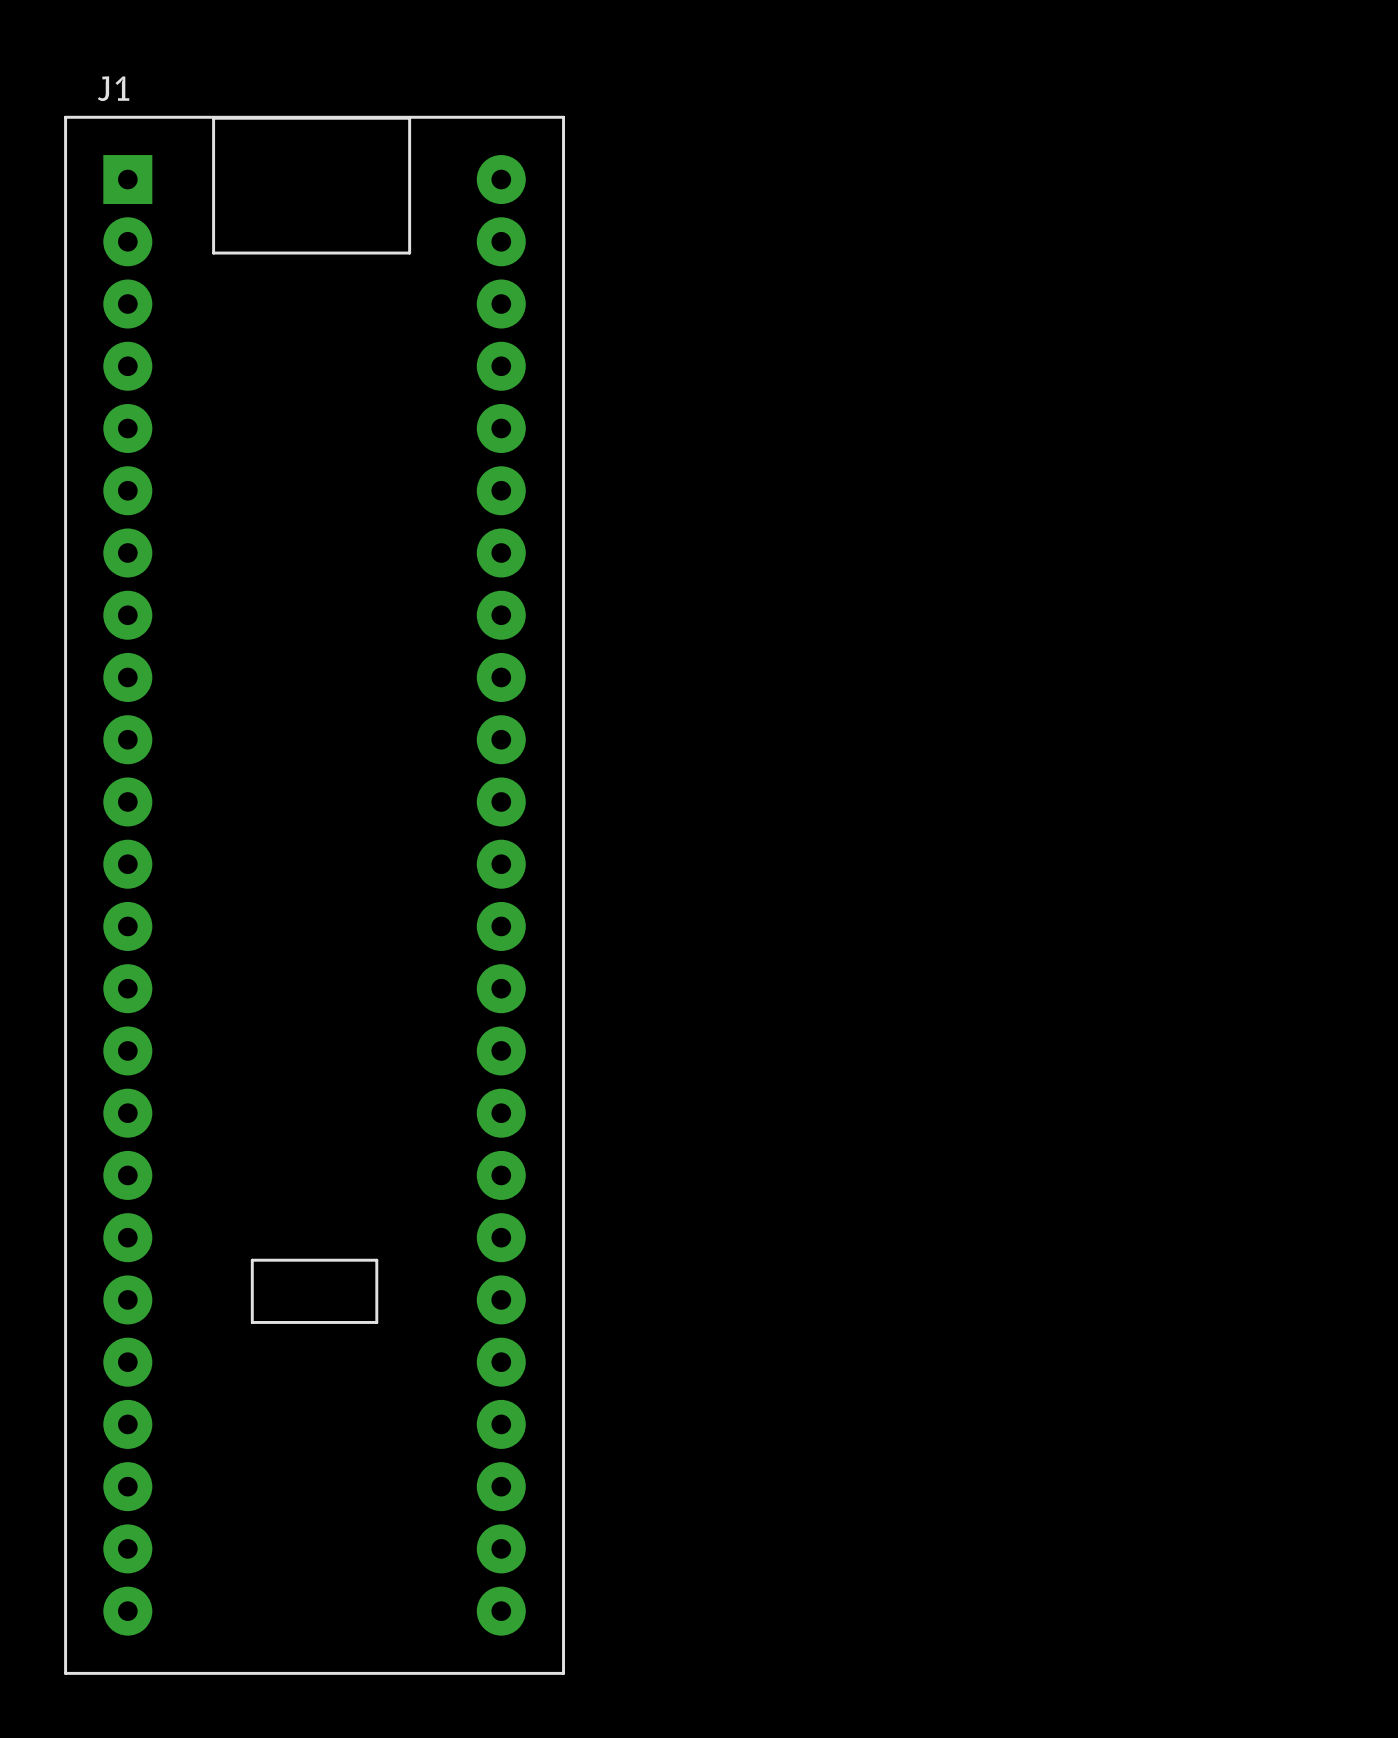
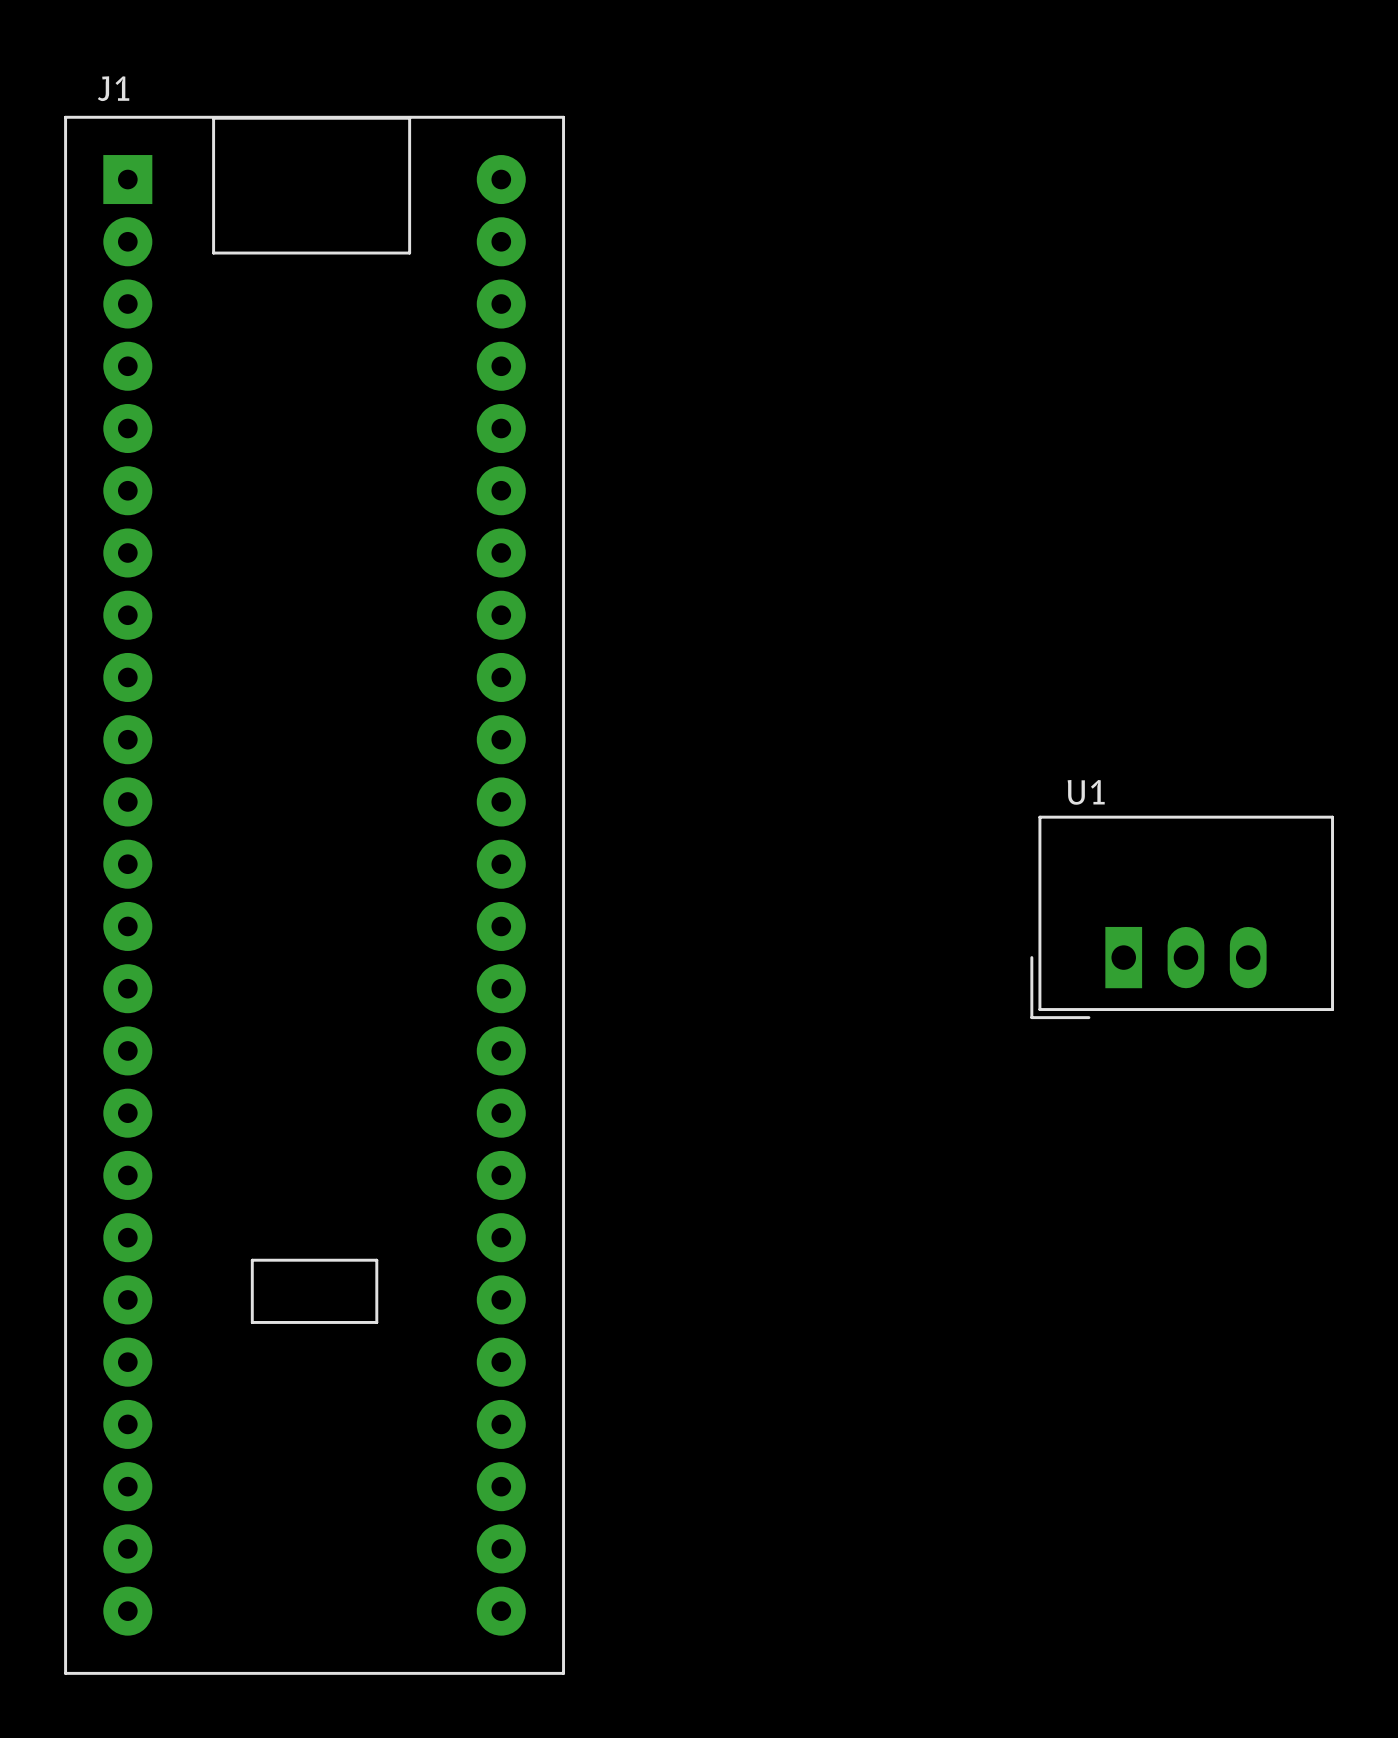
U1: none -> (1182, 917)

